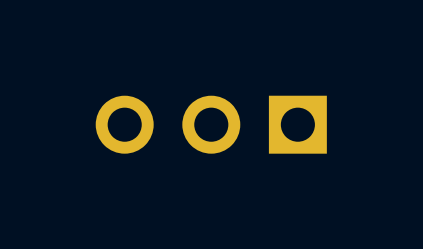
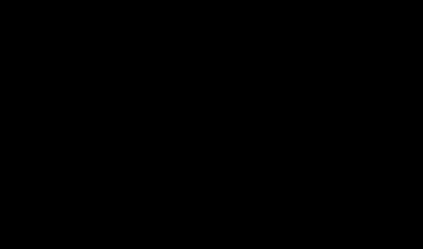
part: (211, 124) -> none

